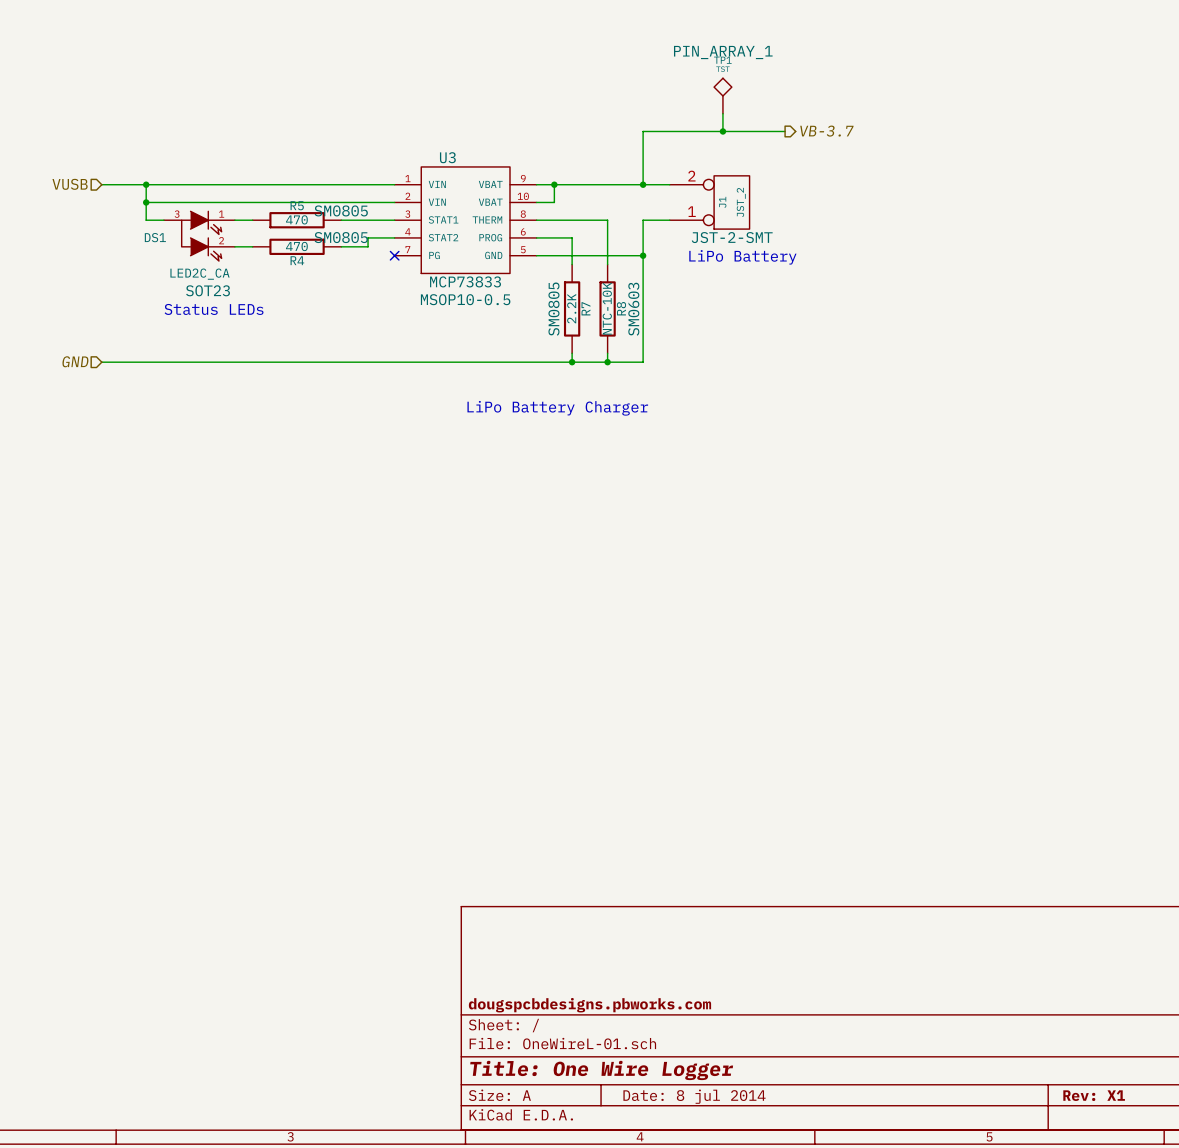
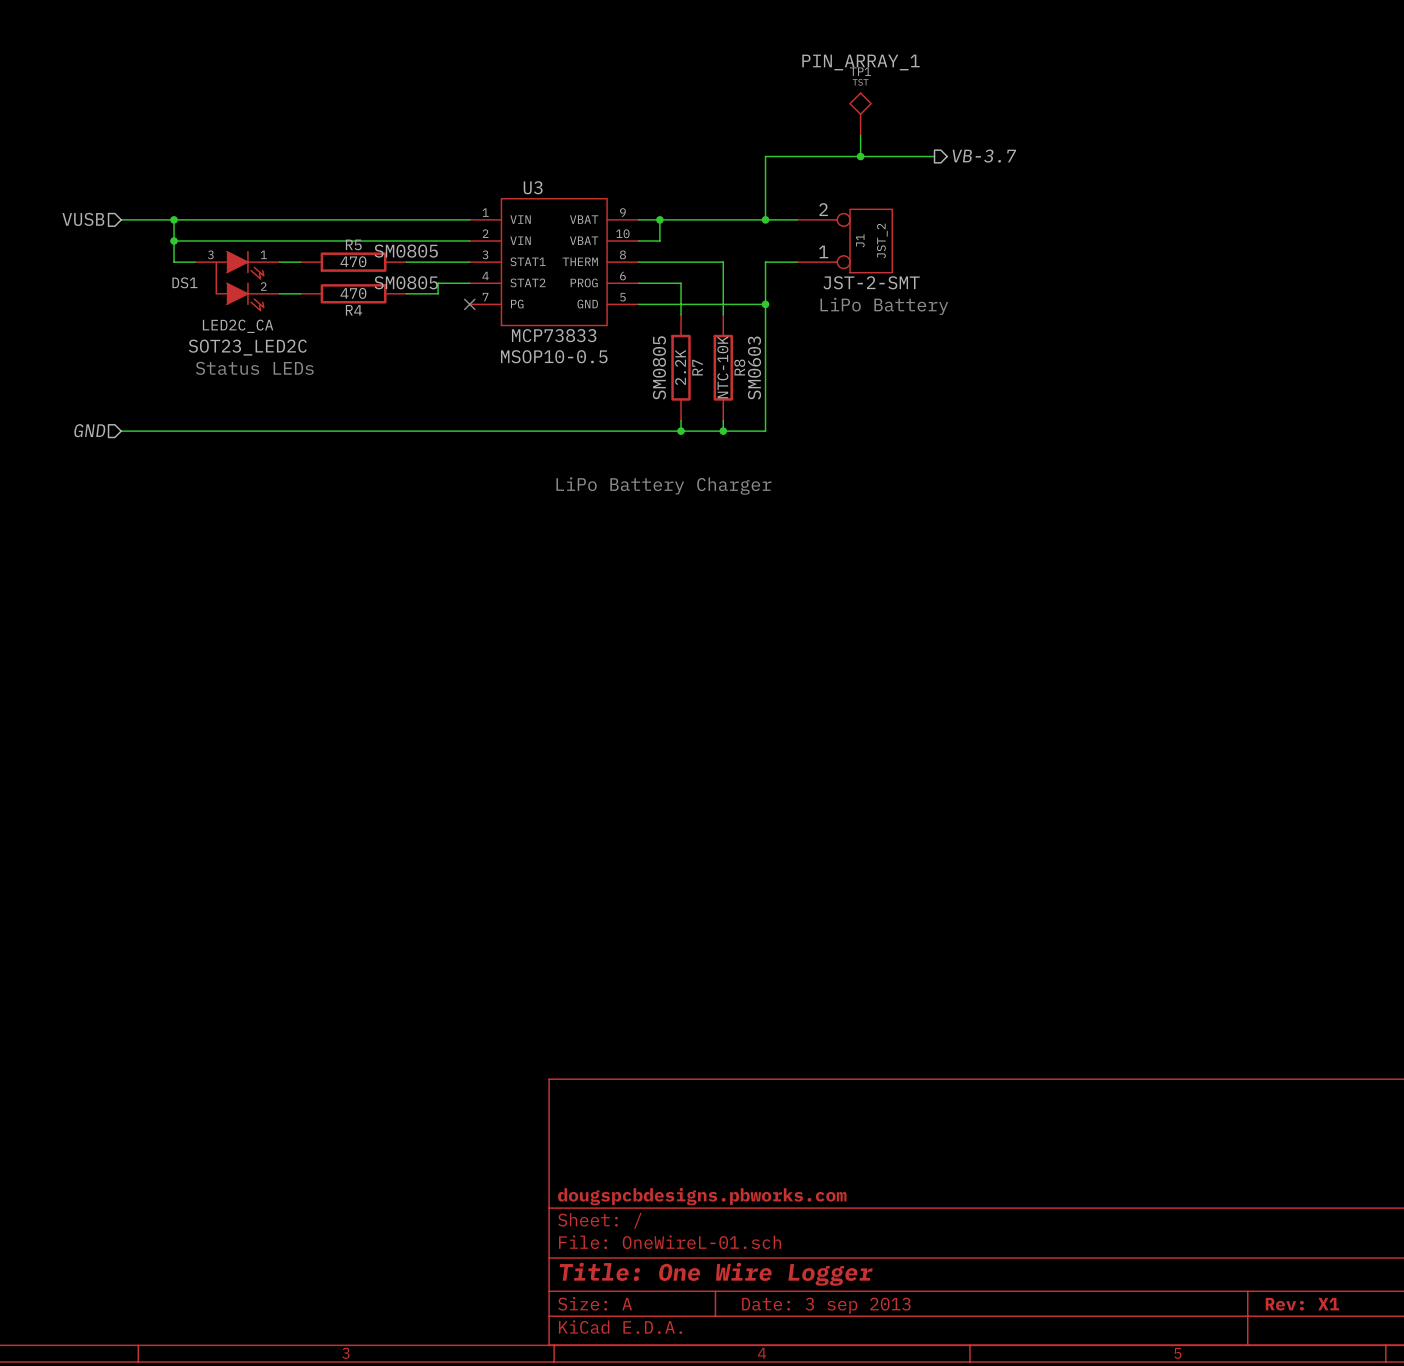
DS1 text: SOT23 (208, 290) -> SOT23_LED2C (247, 347)
title block: Date: 8 jul 2014 (694, 1096) -> Date: 3 sep 2013 (826, 1305)

